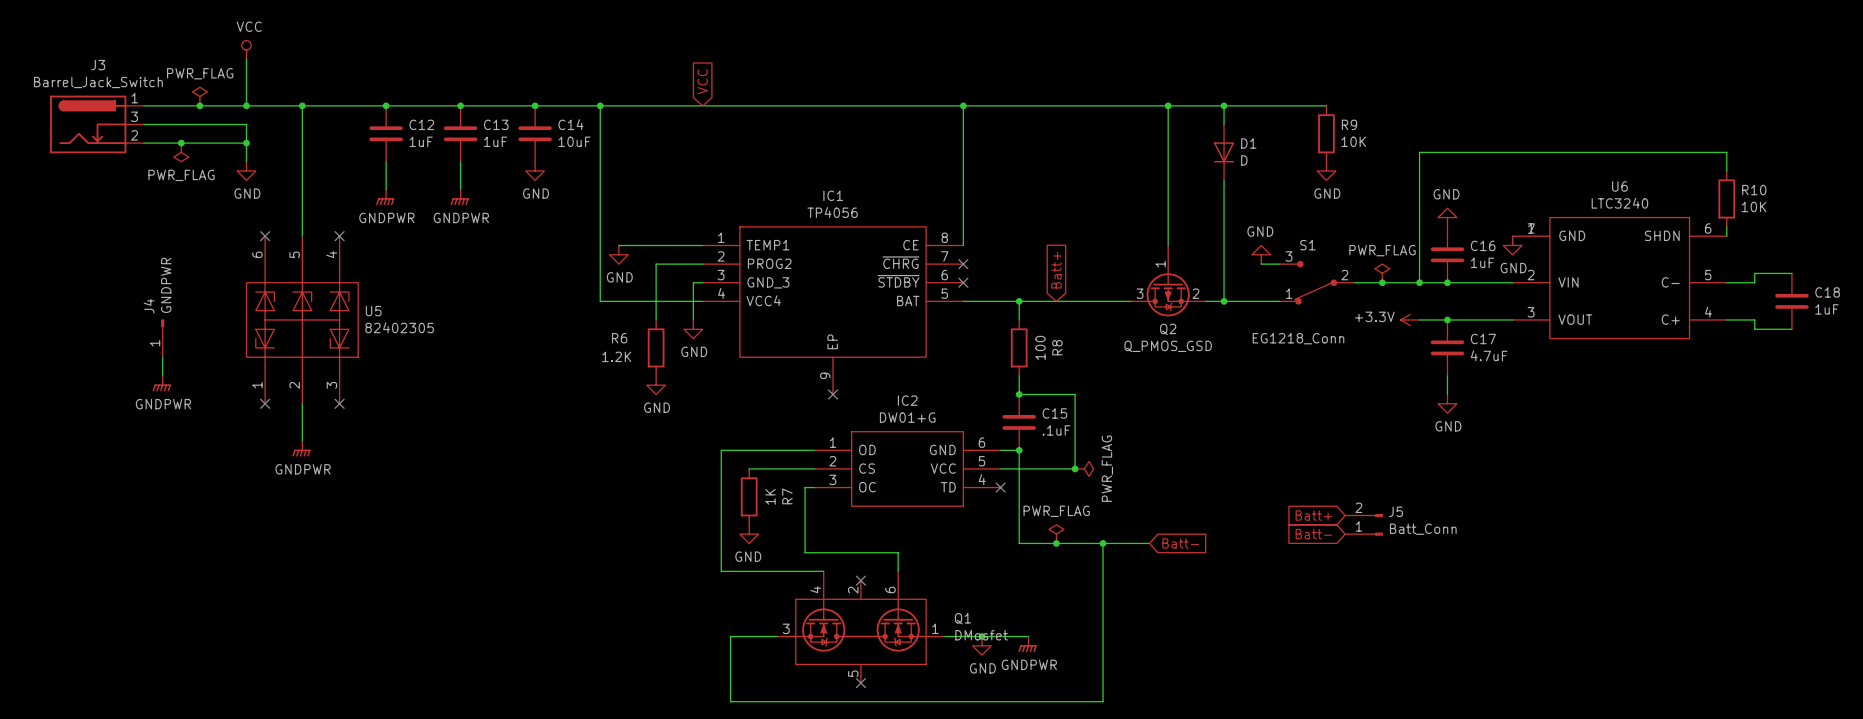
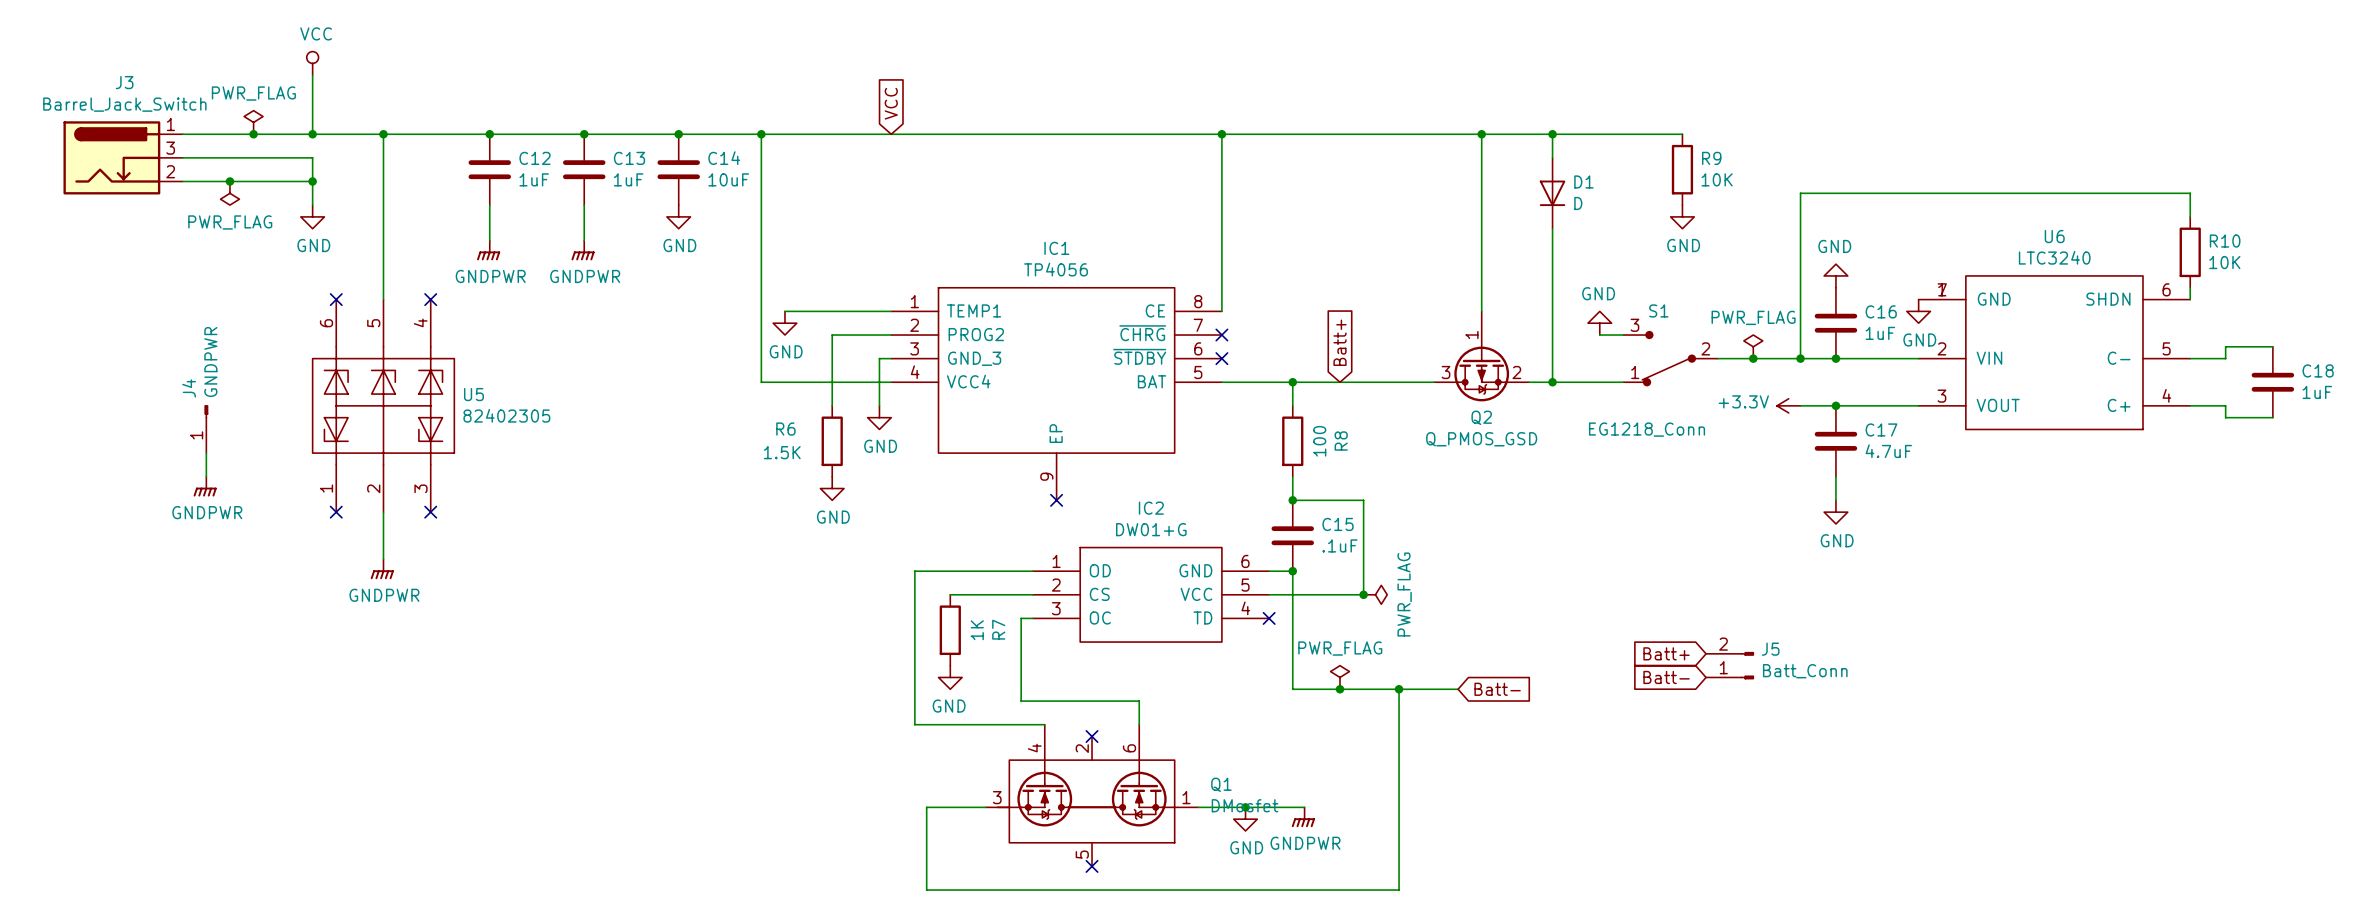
R6 value: 1.2K (616, 356) -> 1.5K (782, 452)

